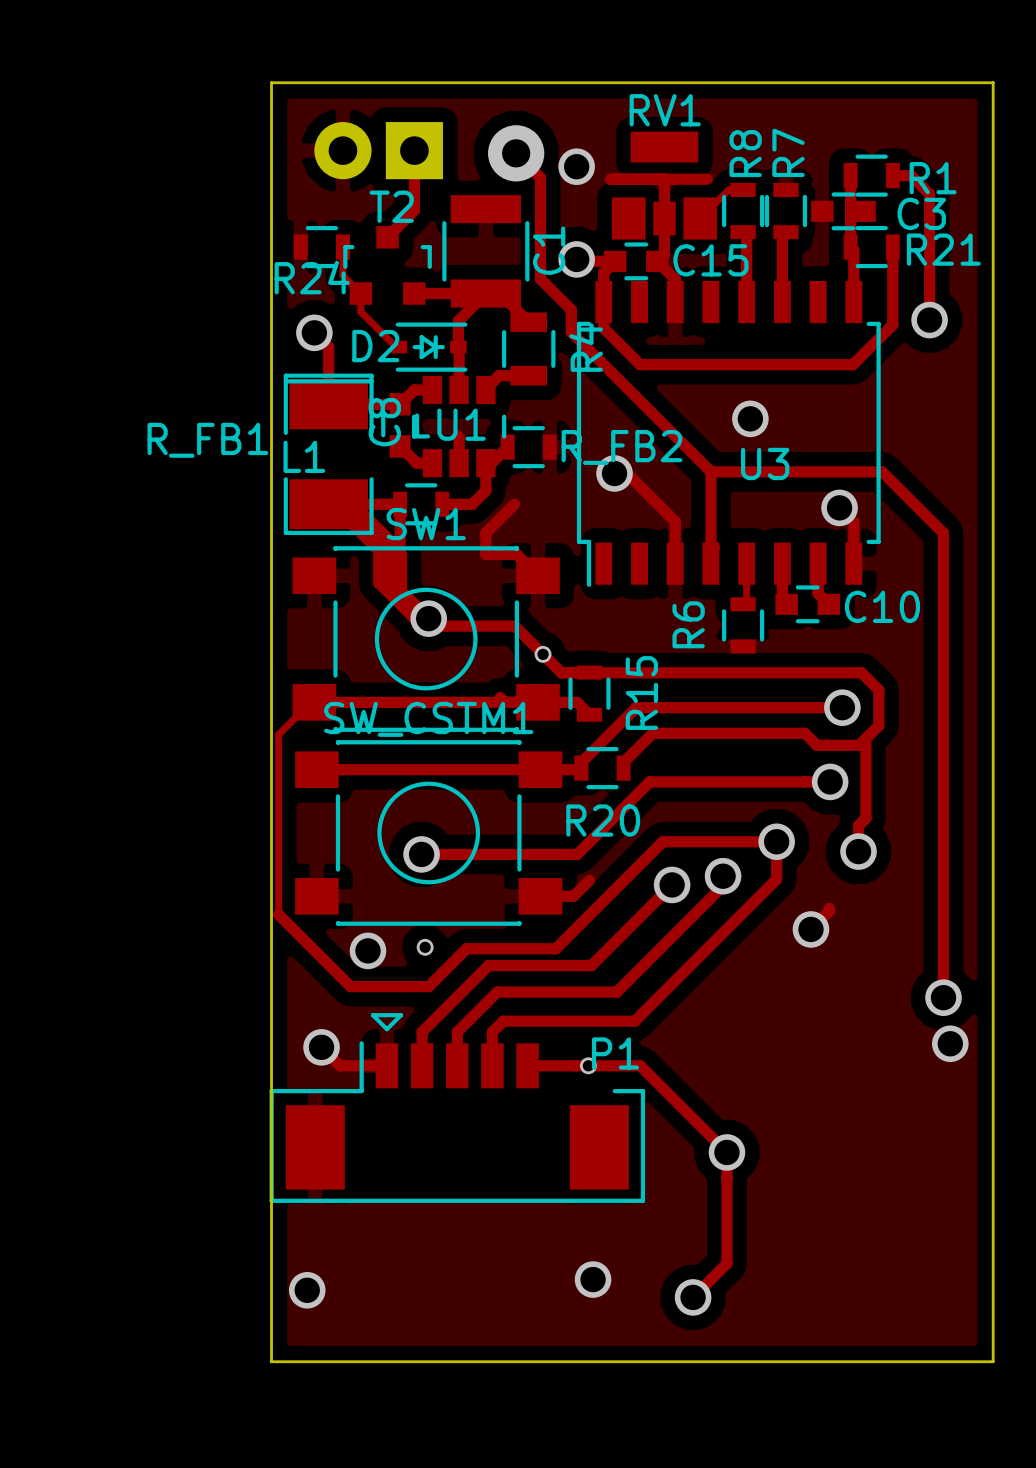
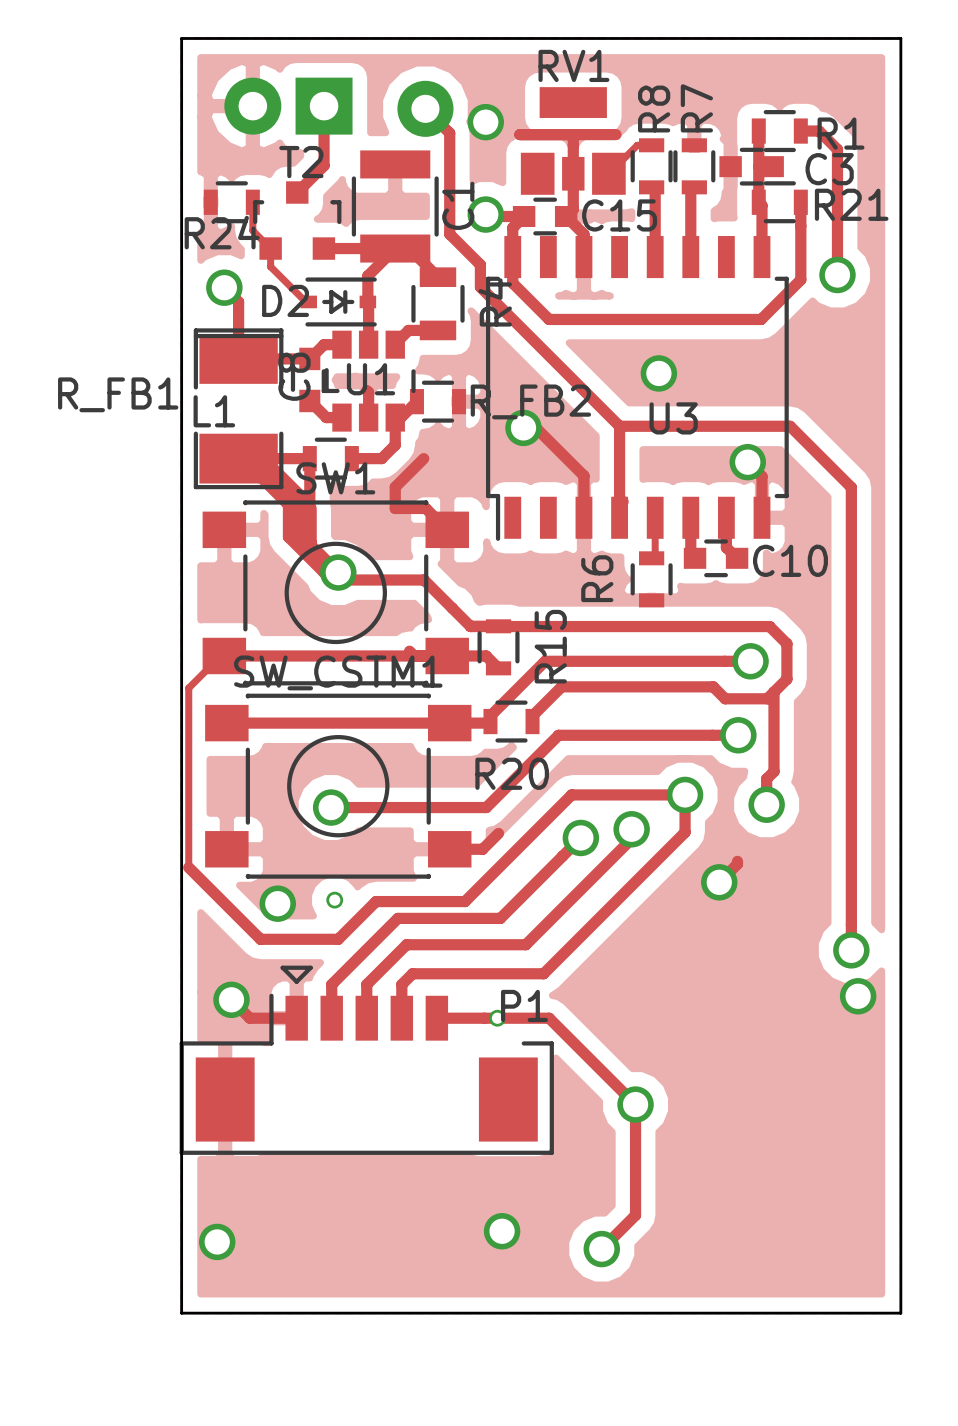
via: (543, 654) -> none

